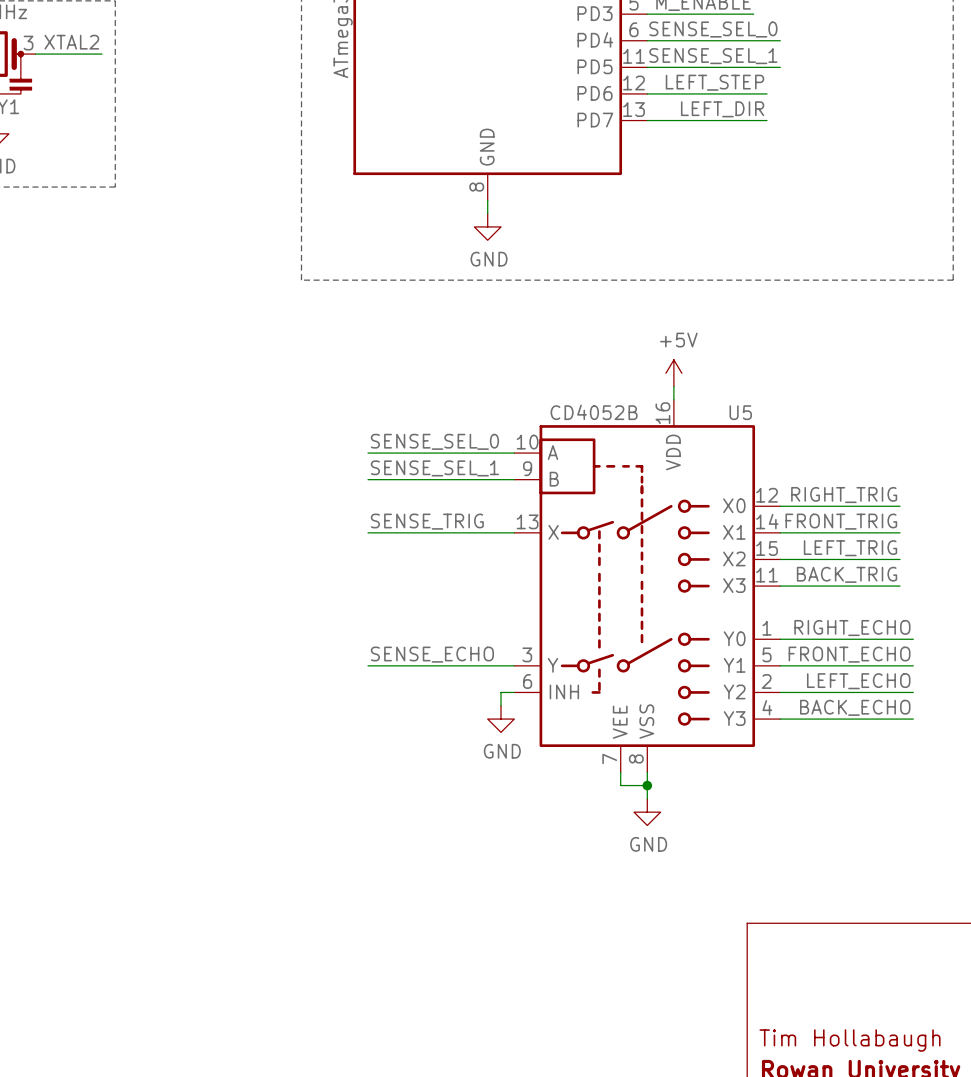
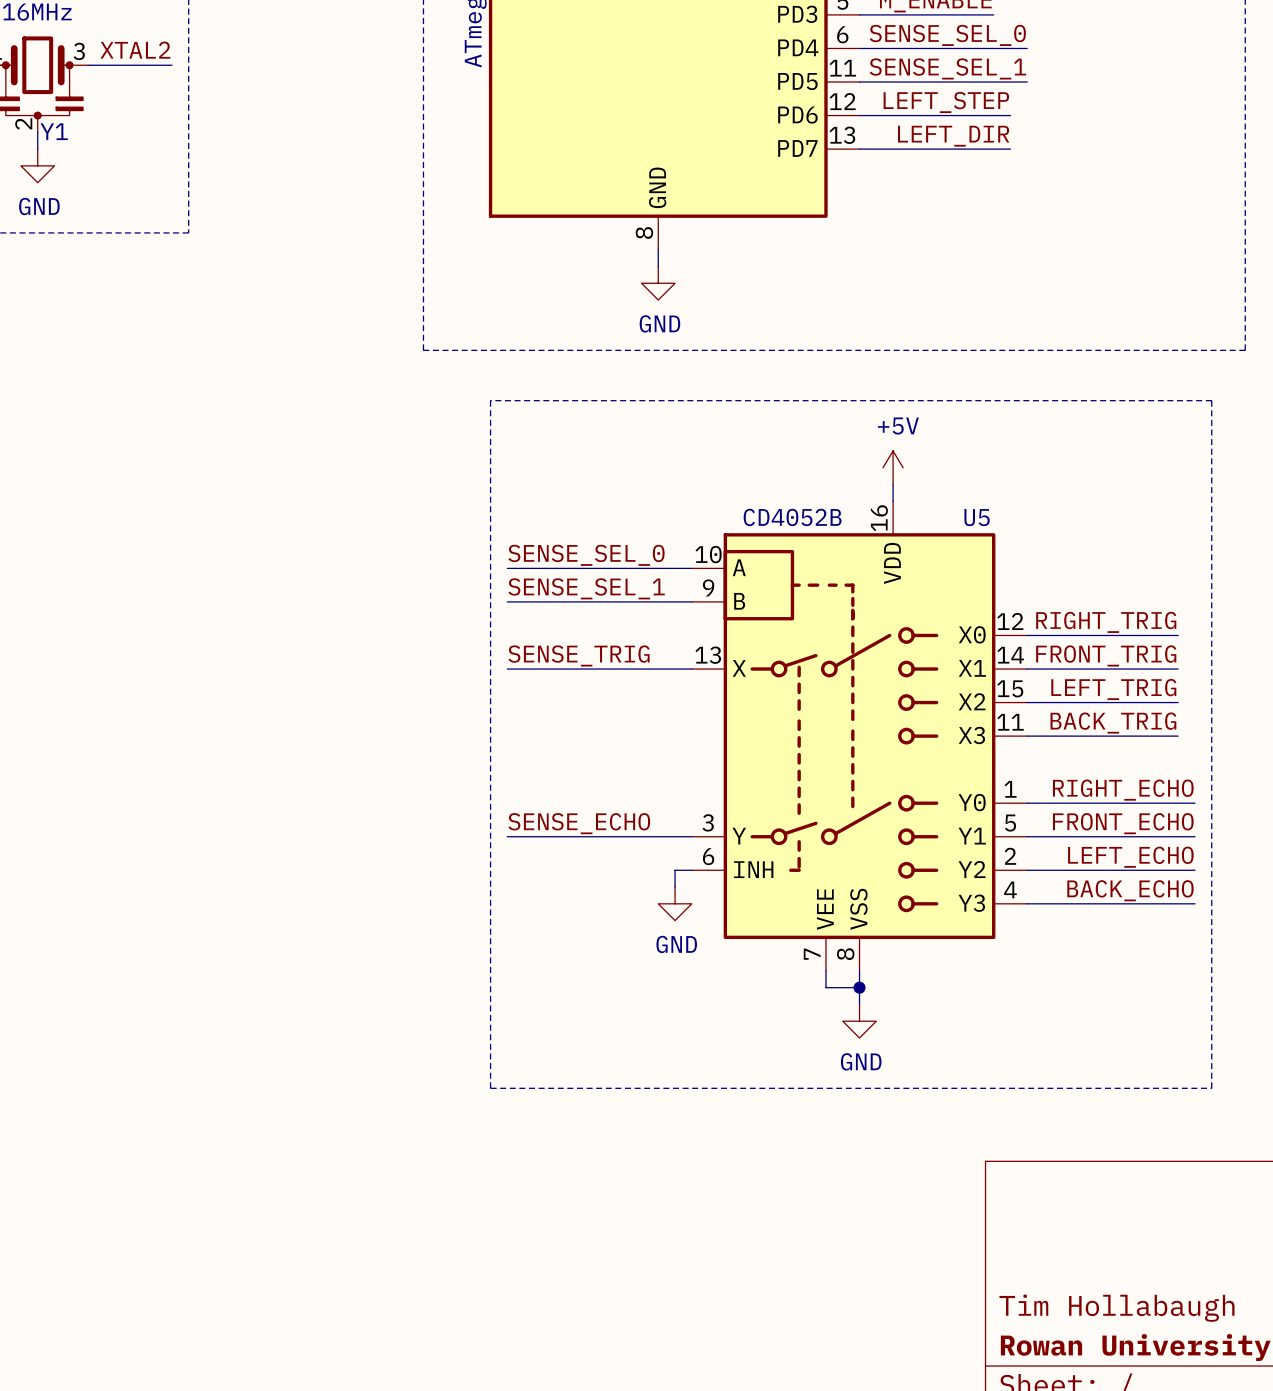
line: none -> (490, 400) (490, 1088) (1211, 1088) (1211, 400) (490, 400)

